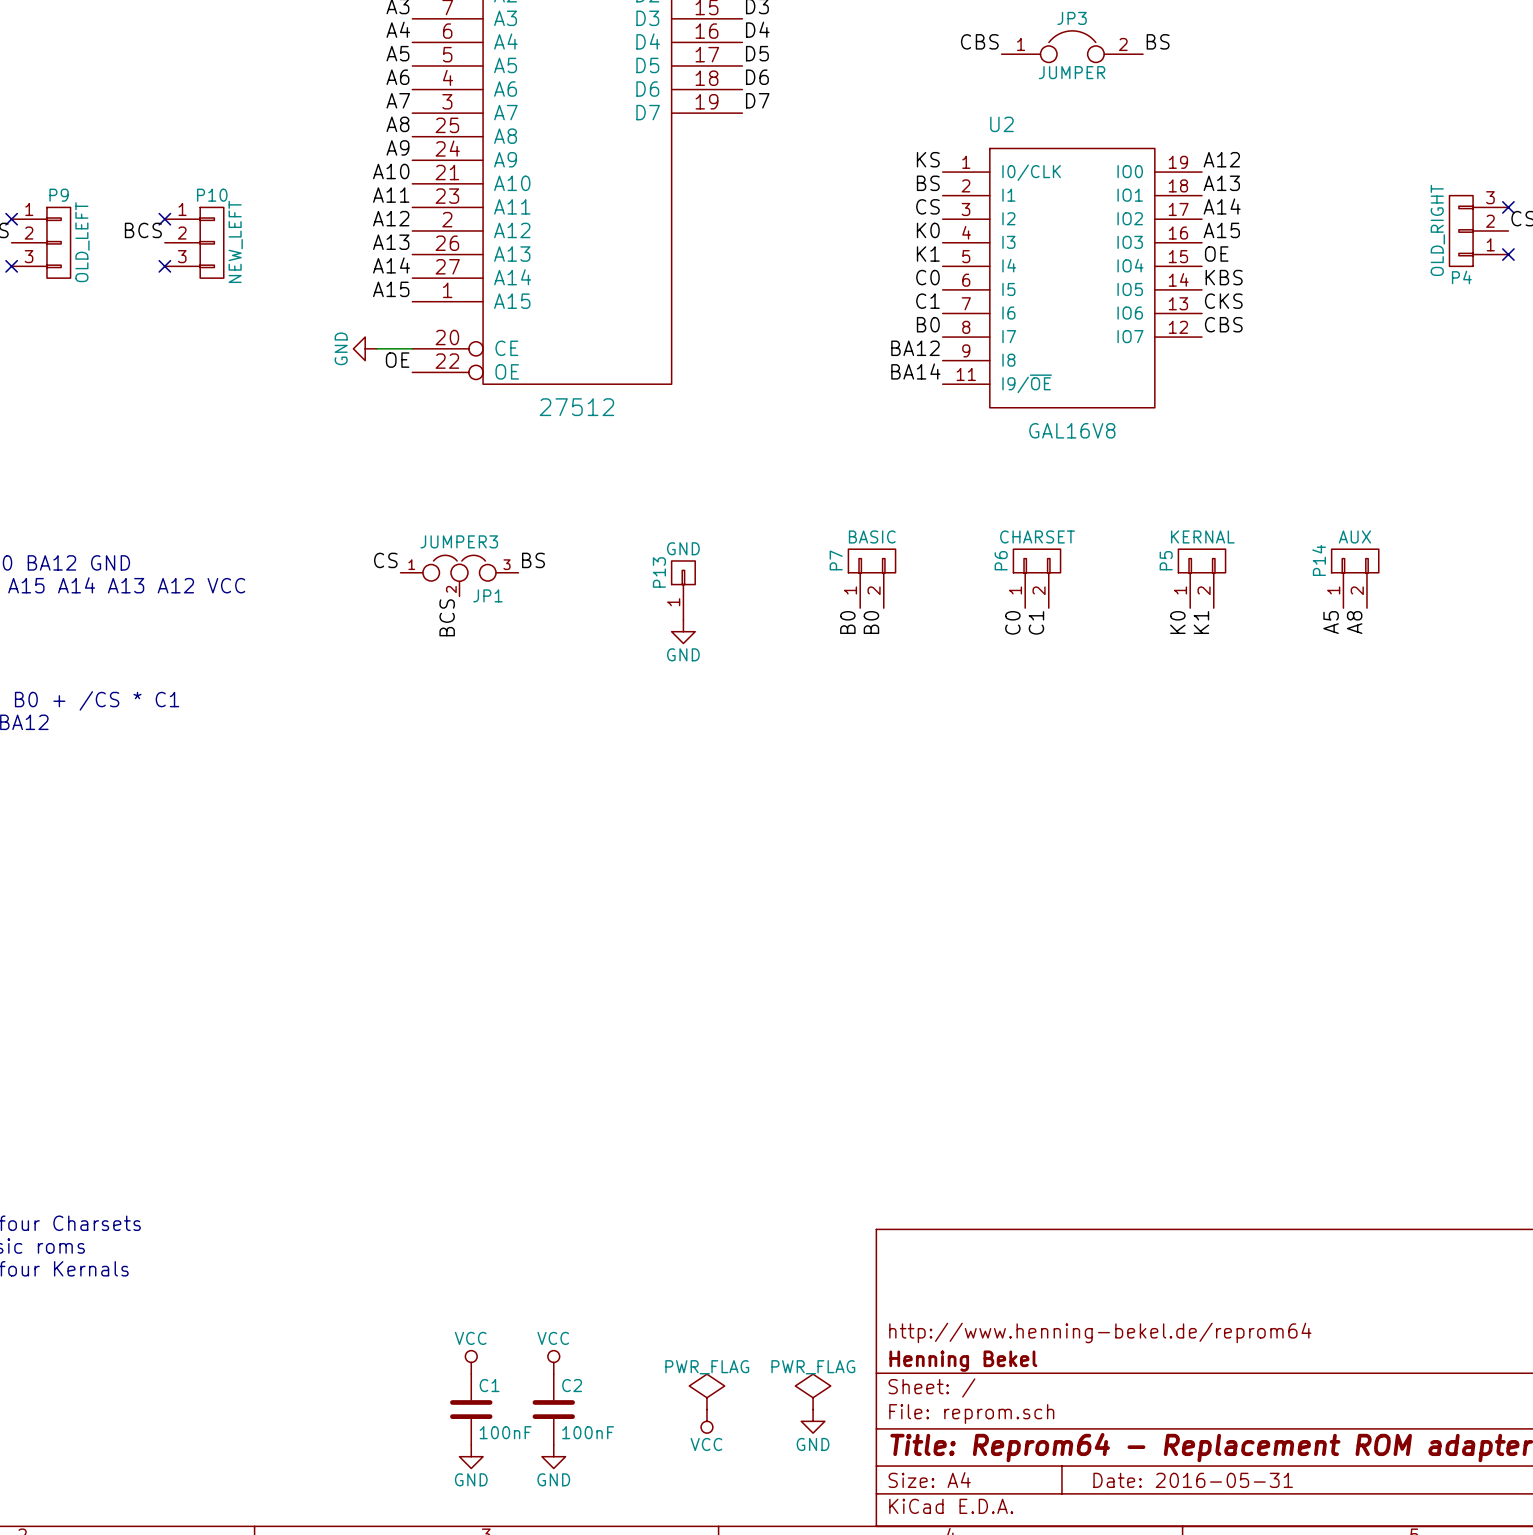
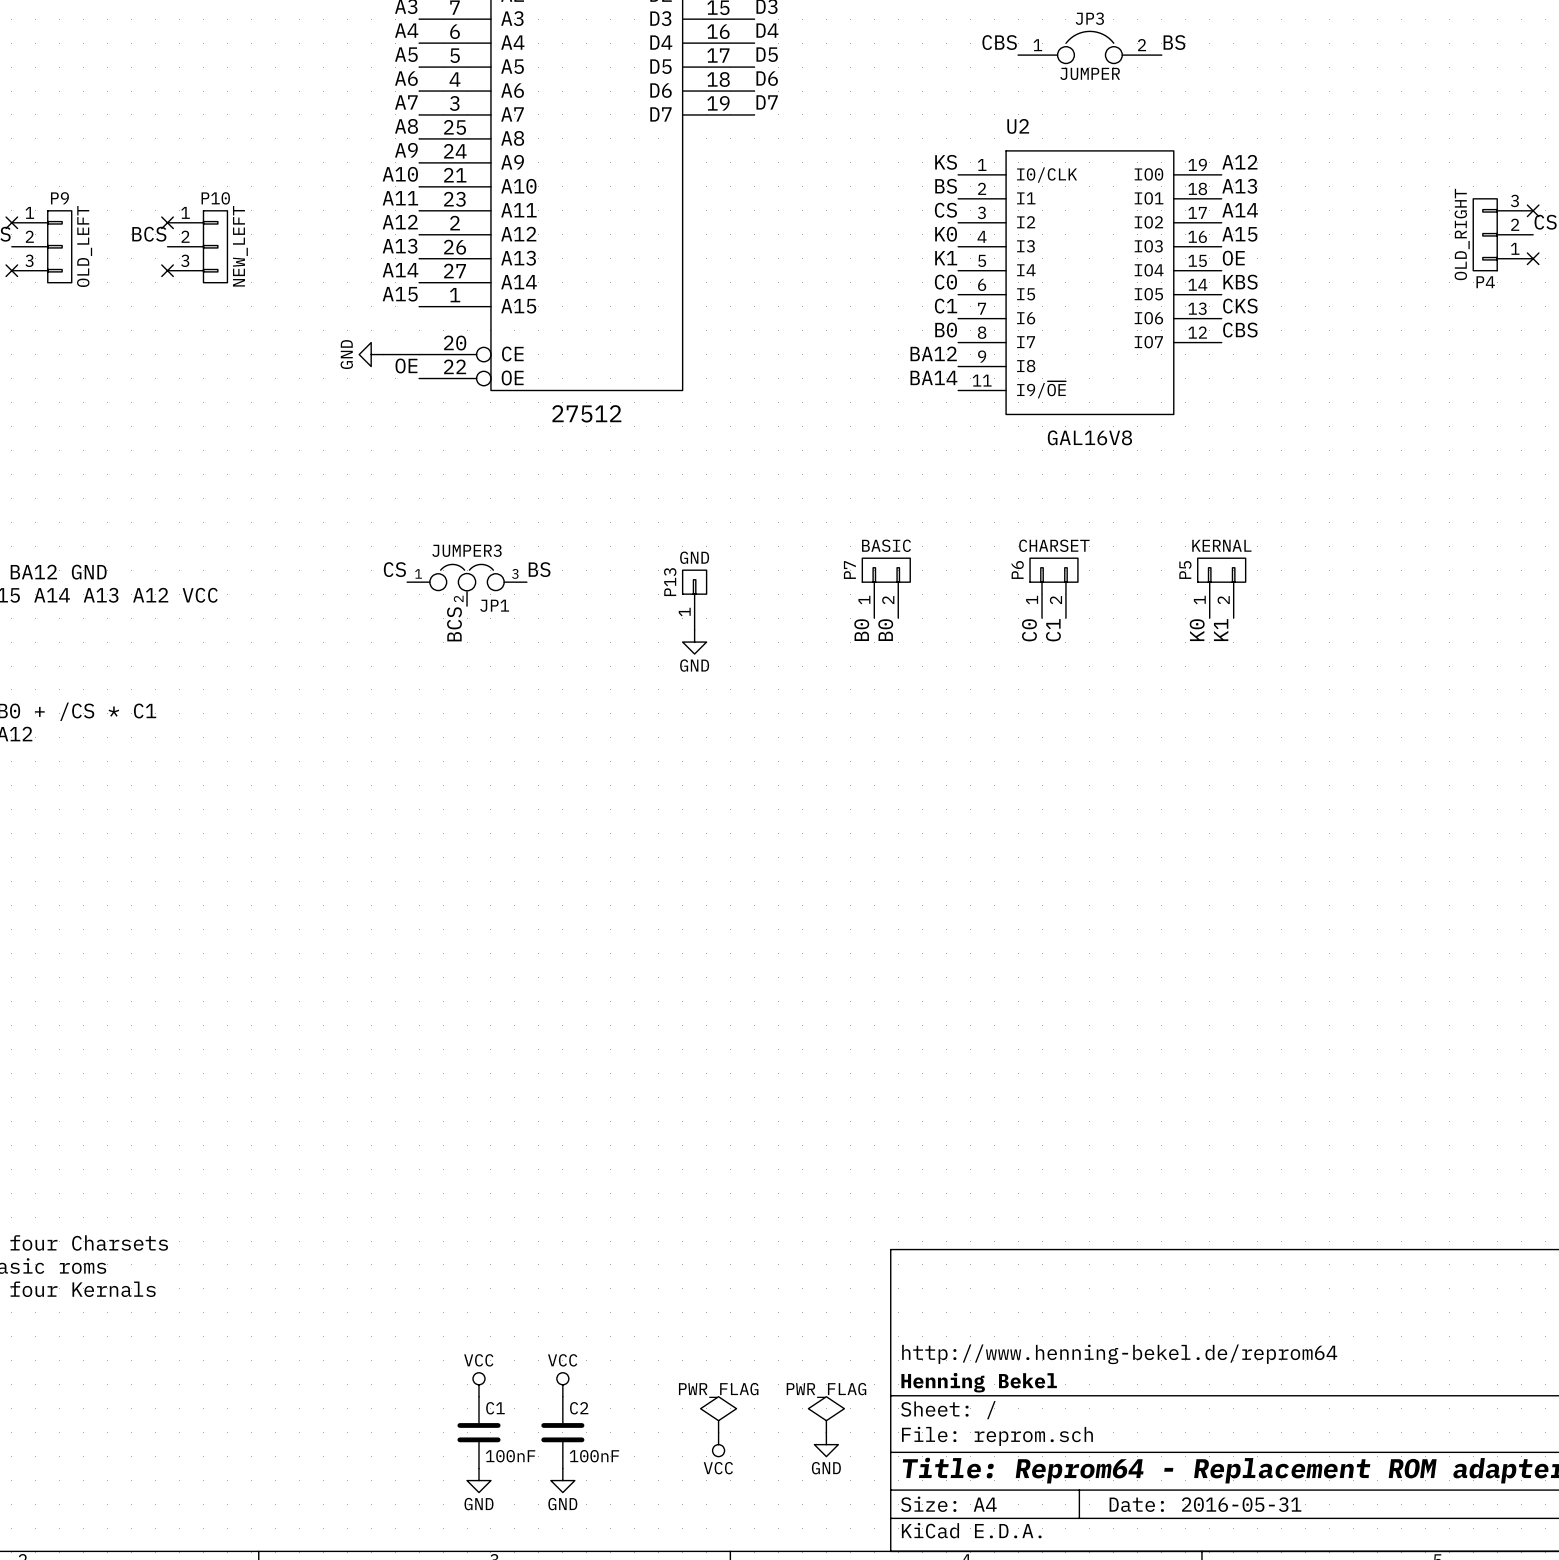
P14: AUX (1355, 578) -> none
label: A5 (1331, 622) -> none
label: A8 (1354, 622) -> none

